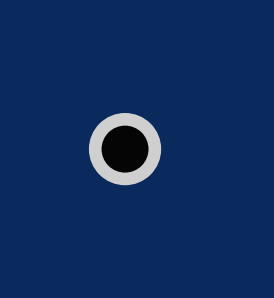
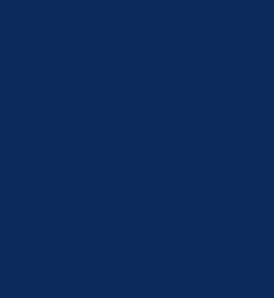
part: (125, 149) -> none

